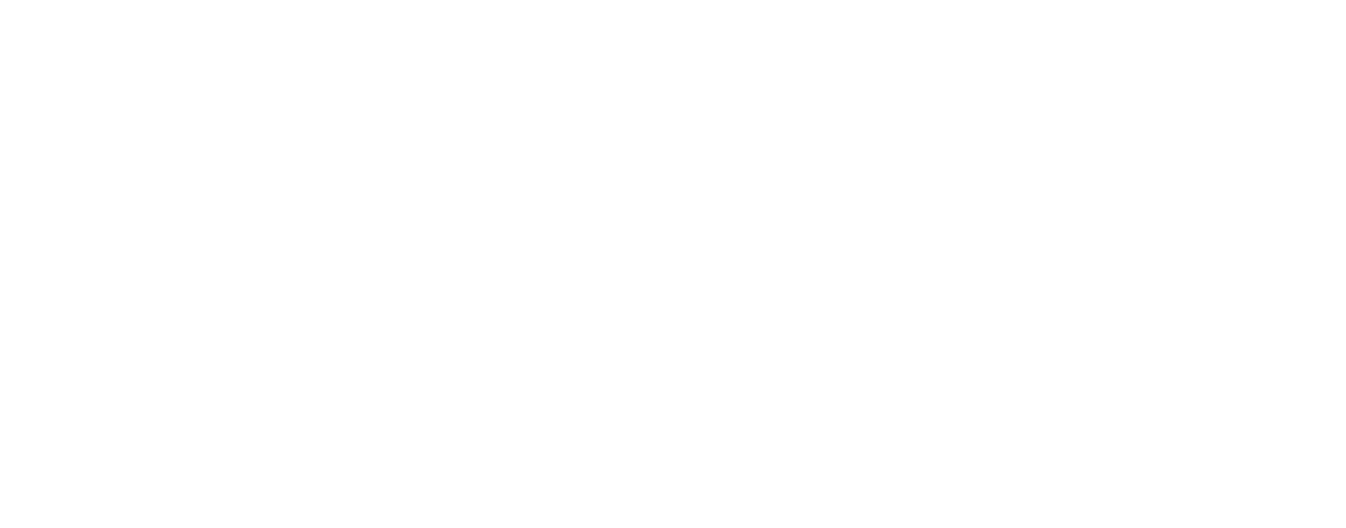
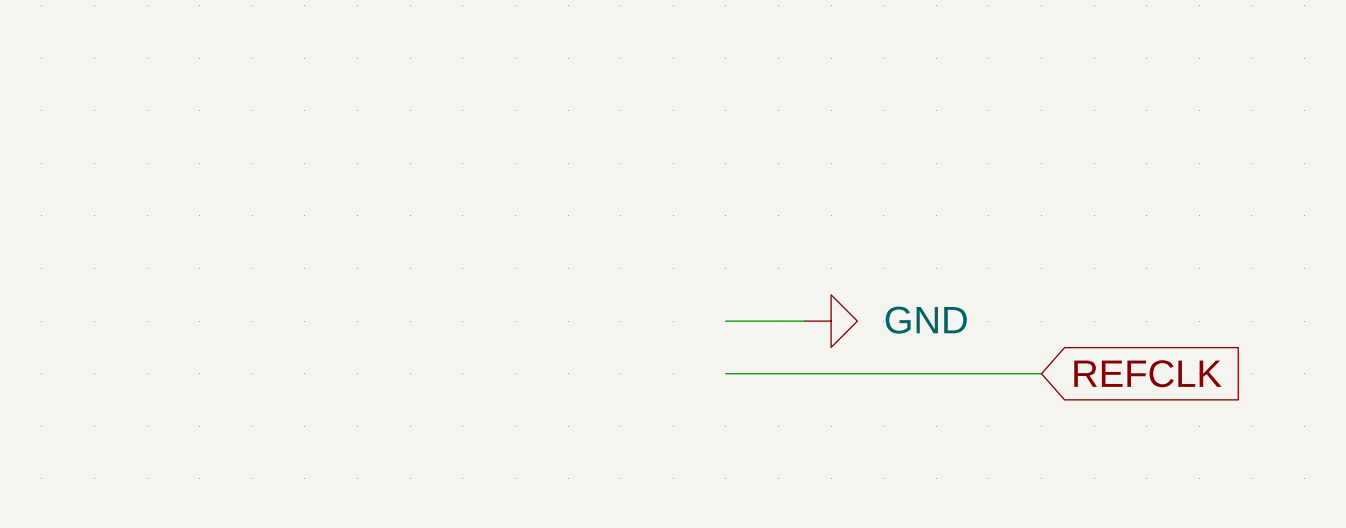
wire: none -> (725, 321) (804, 321)
power symbol: none -> GND (831, 321)
wire: none -> (725, 373) (1041, 373)
global label: none -> REFCLK (1147, 373)

